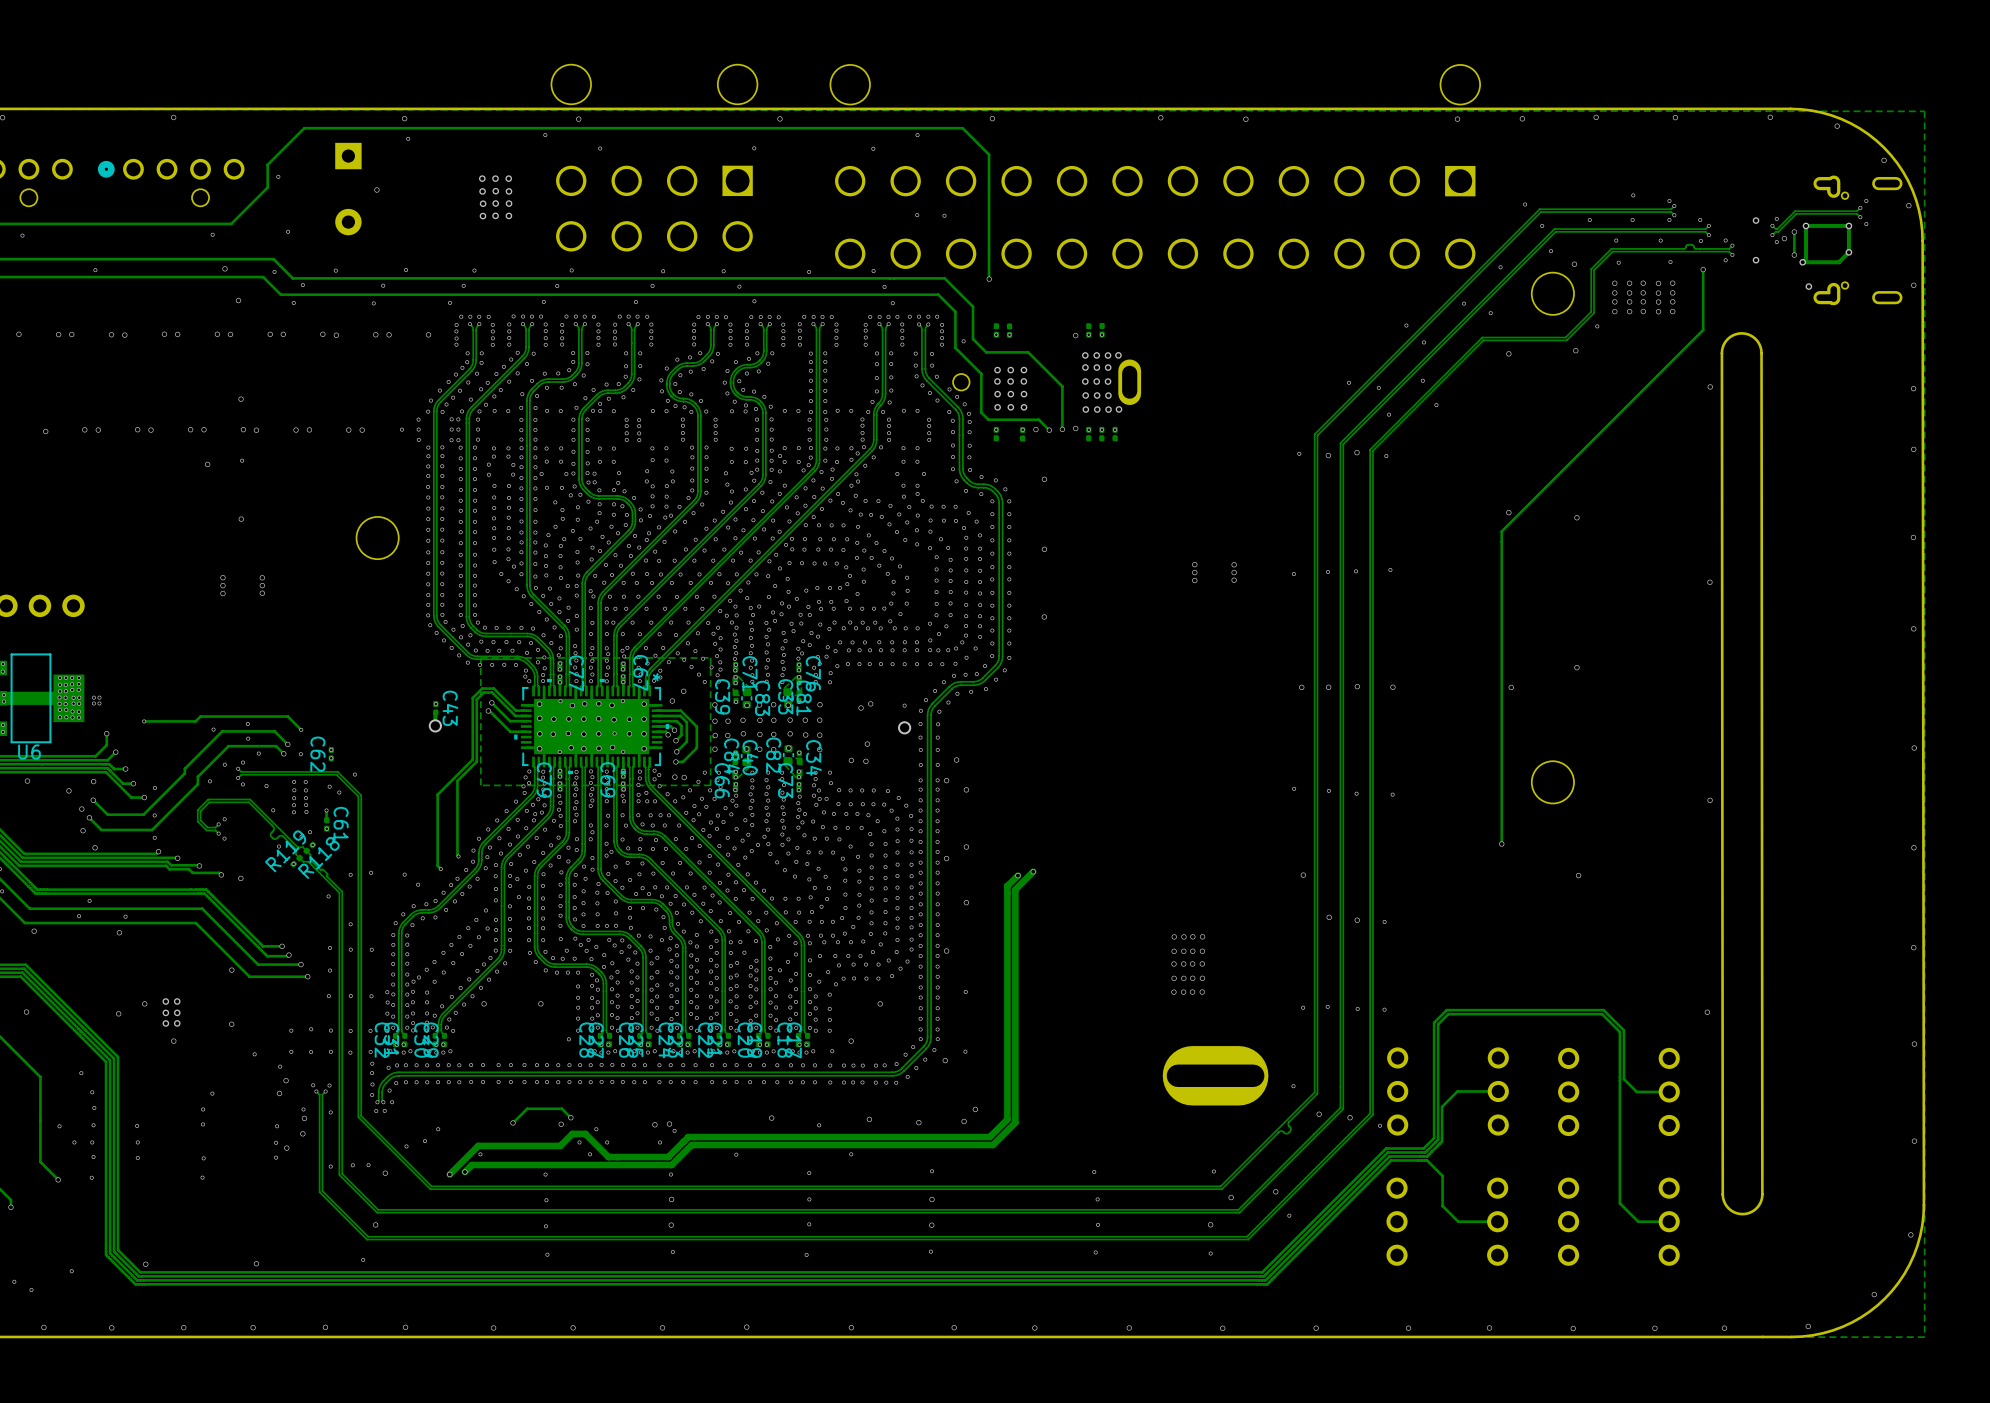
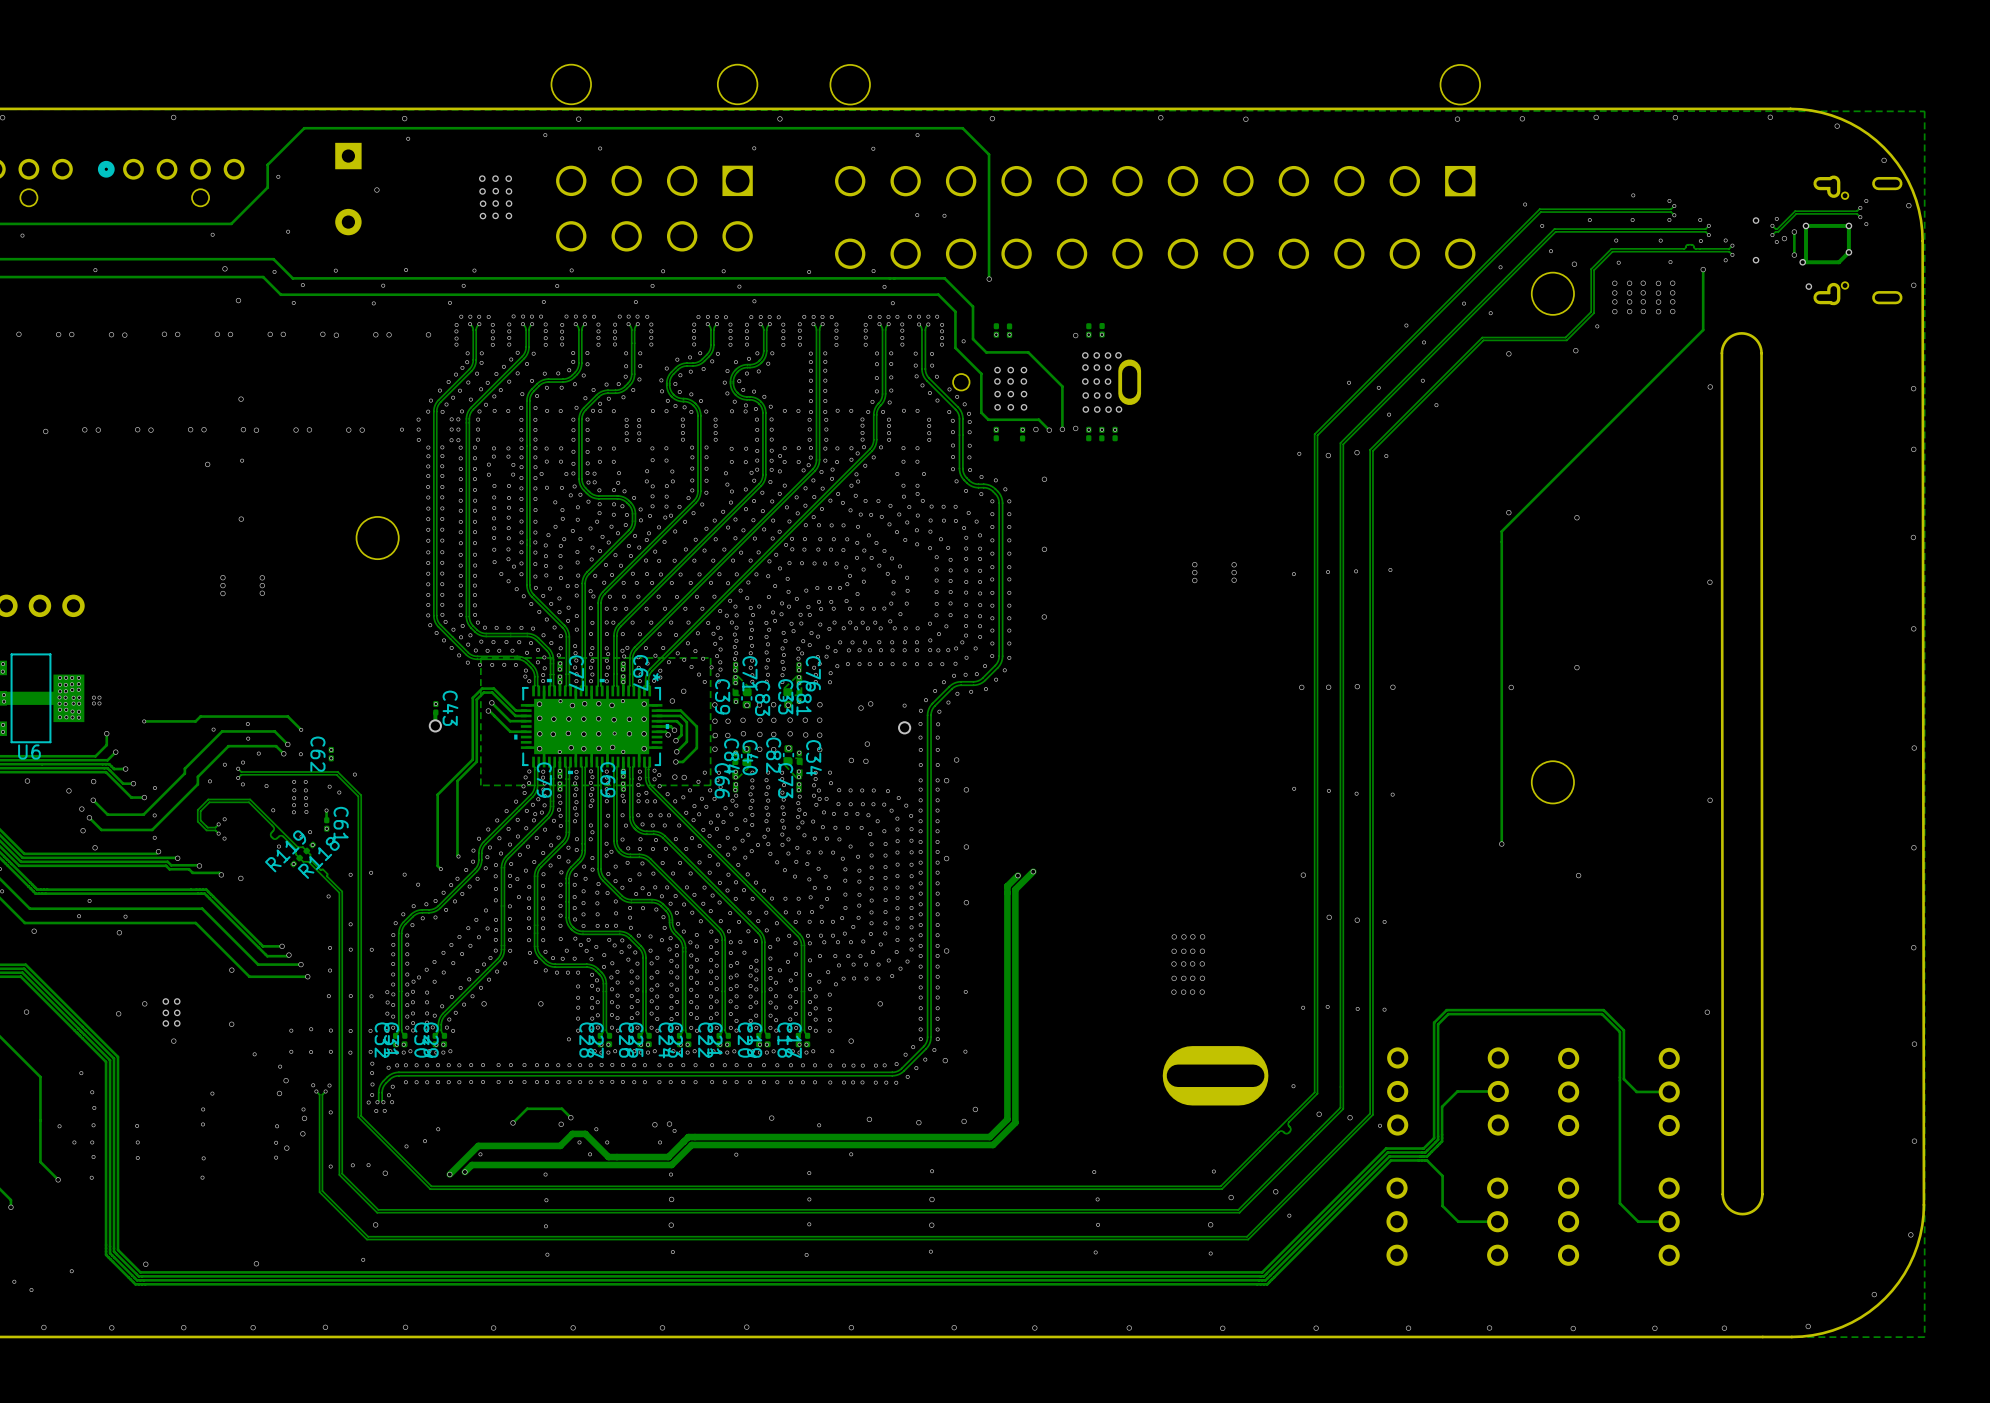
via: (396, 1083) -> none
via: none -> (392, 1086)
via: (389, 1090) -> none
via: none -> (388, 1095)
via: none -> (368, 1102)

